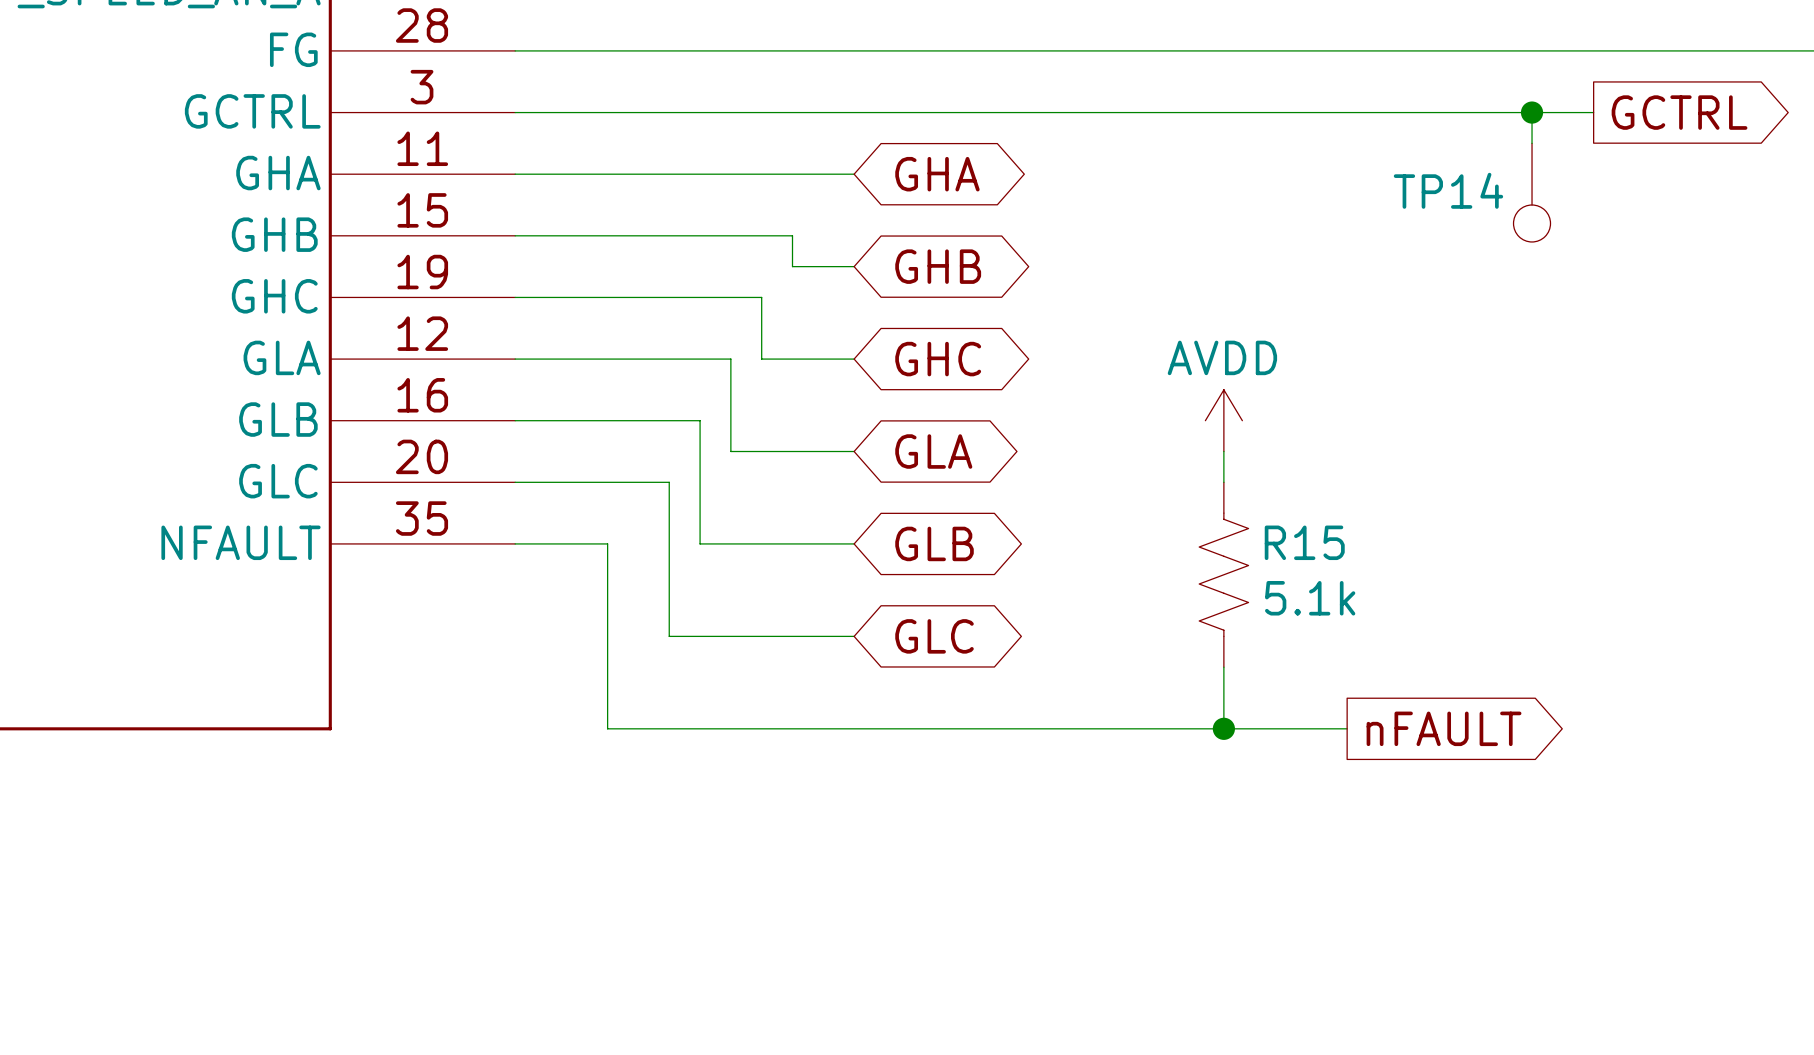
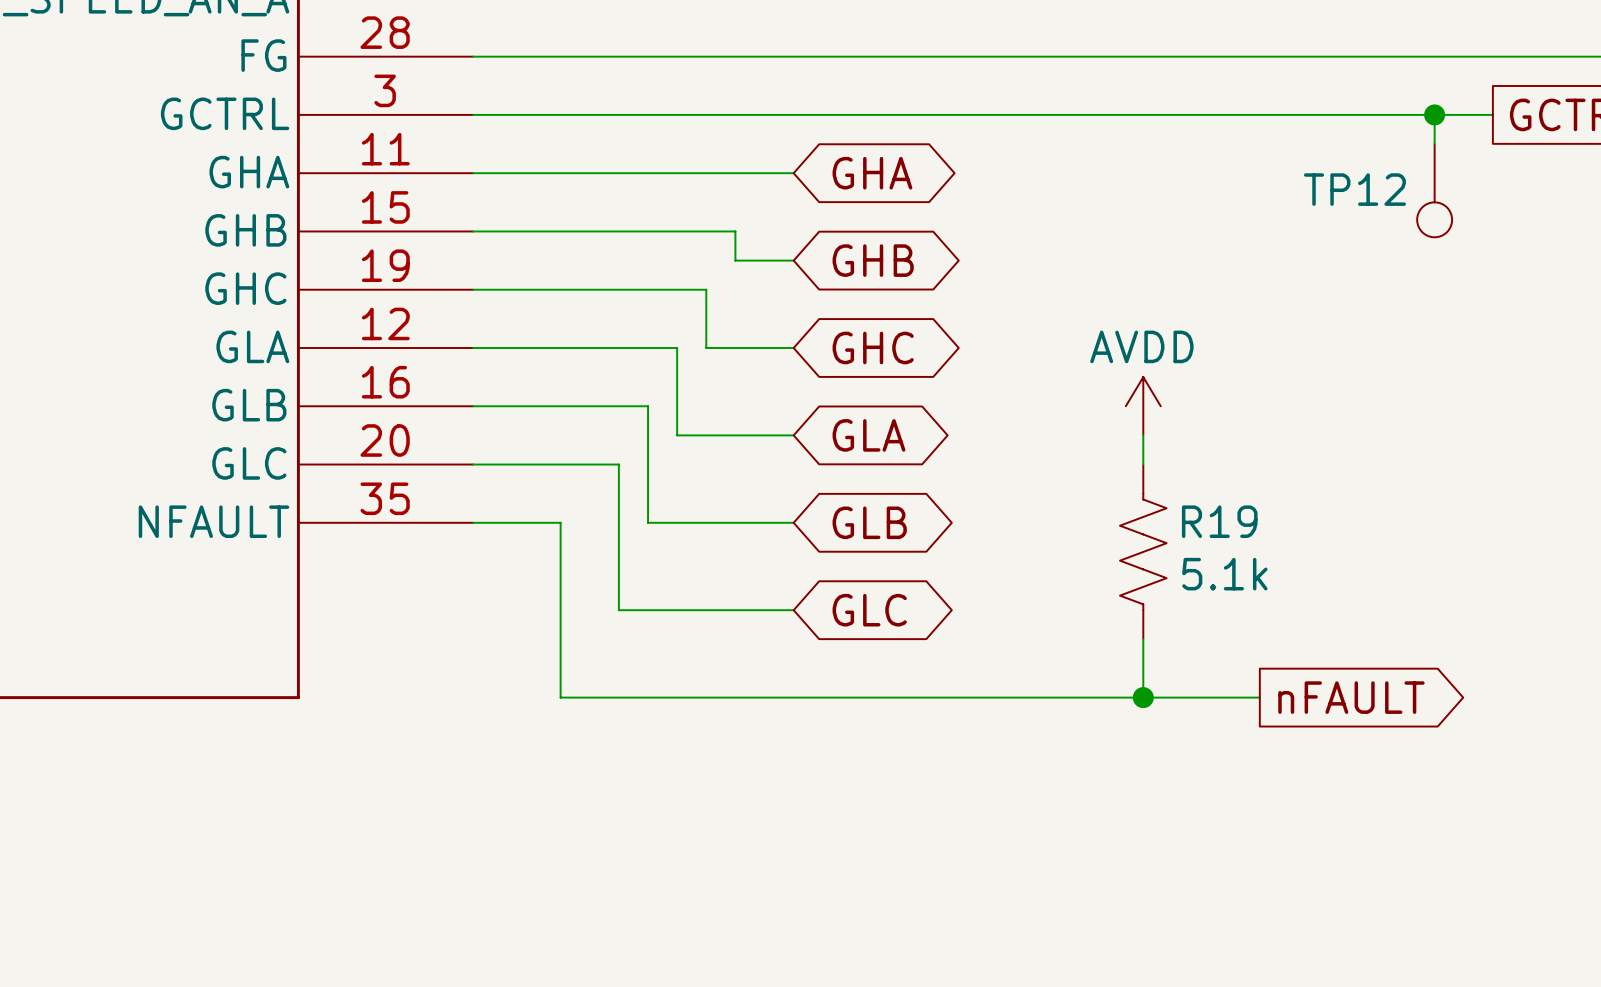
TP14 name: TP14 (1448, 190) -> TP12 (1354, 189)
R15 name: R15 (1304, 542) -> R19 (1219, 521)

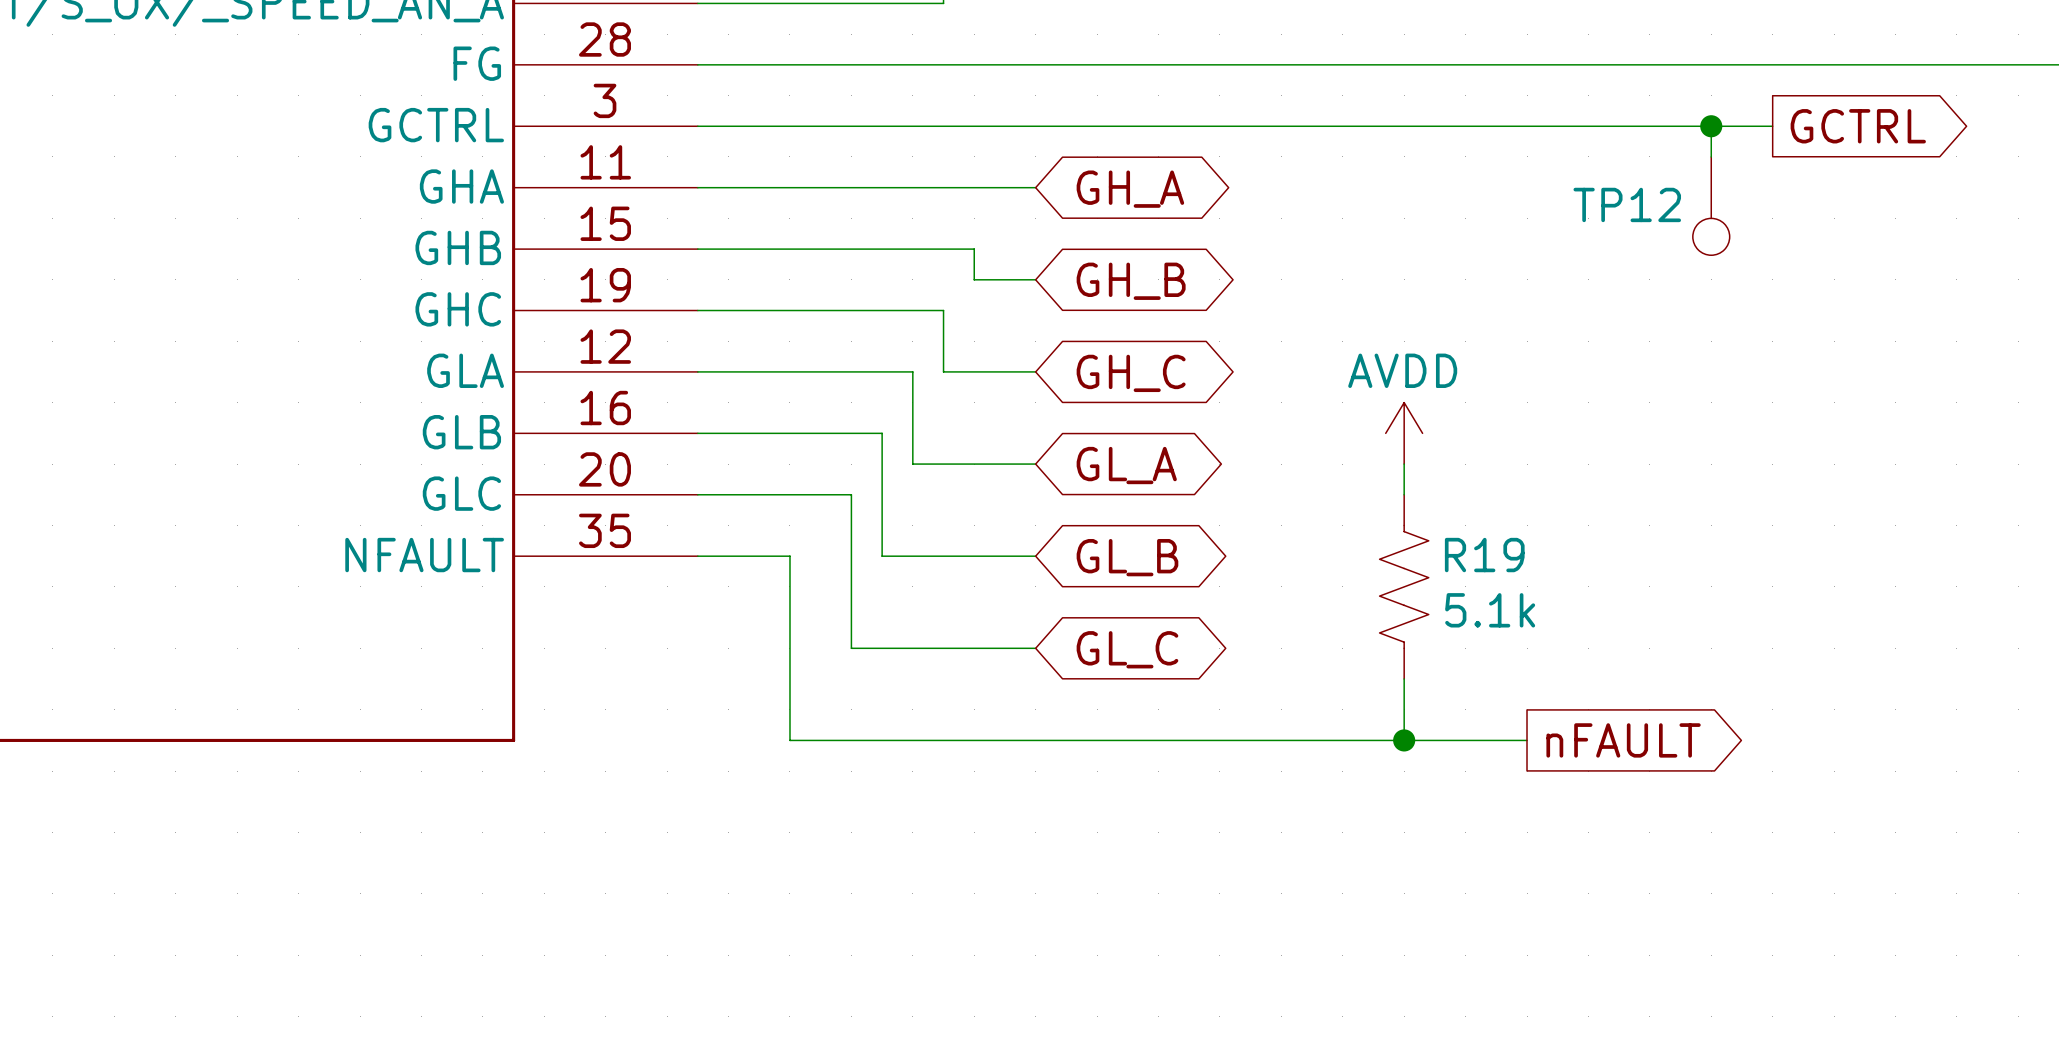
global label: GHA (872, 173) -> GH_A (1130, 189)
global label: GHB (873, 260) -> GH_B (1131, 281)
global label: GHC (873, 347) -> GH_C (1131, 373)
global label: GLA (869, 435) -> GL_A (1126, 465)
global label: GLB (869, 522) -> GL_B (1127, 557)
global label: GLC (869, 610) -> GL_C (1127, 649)

